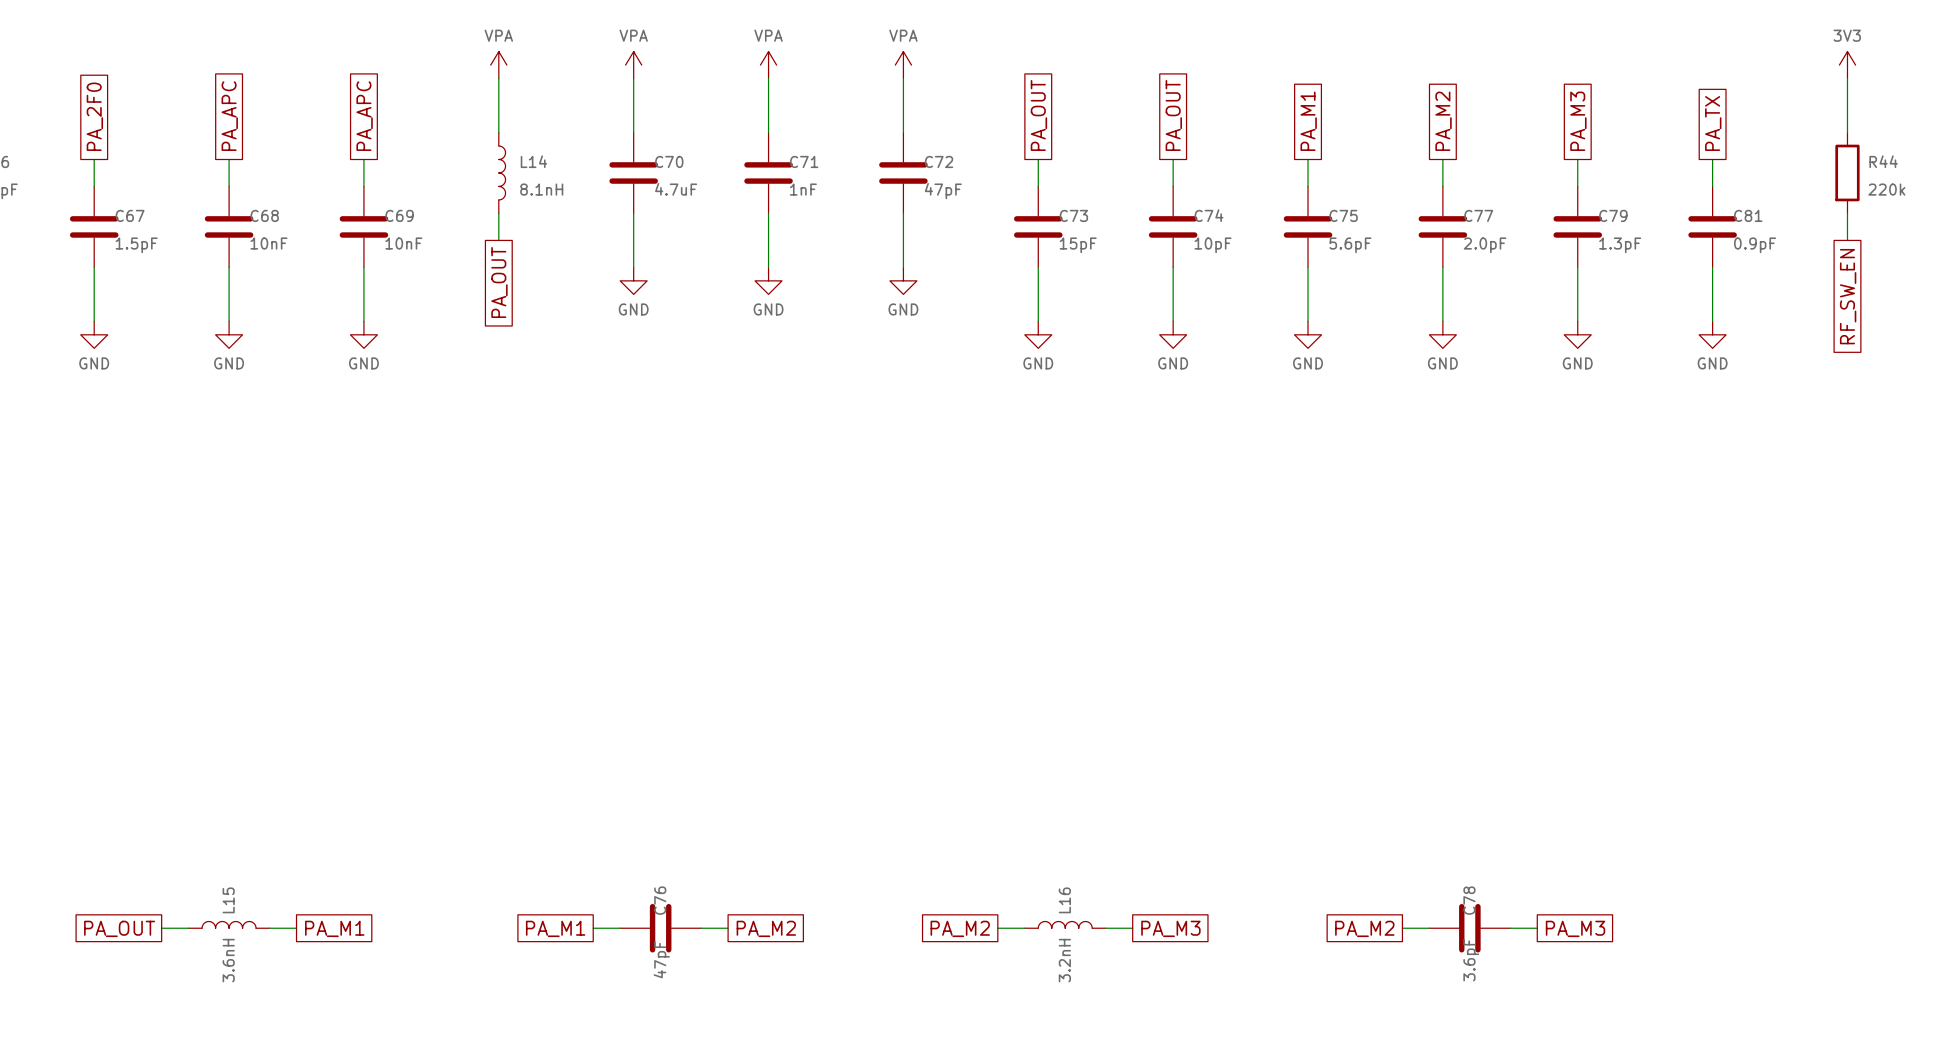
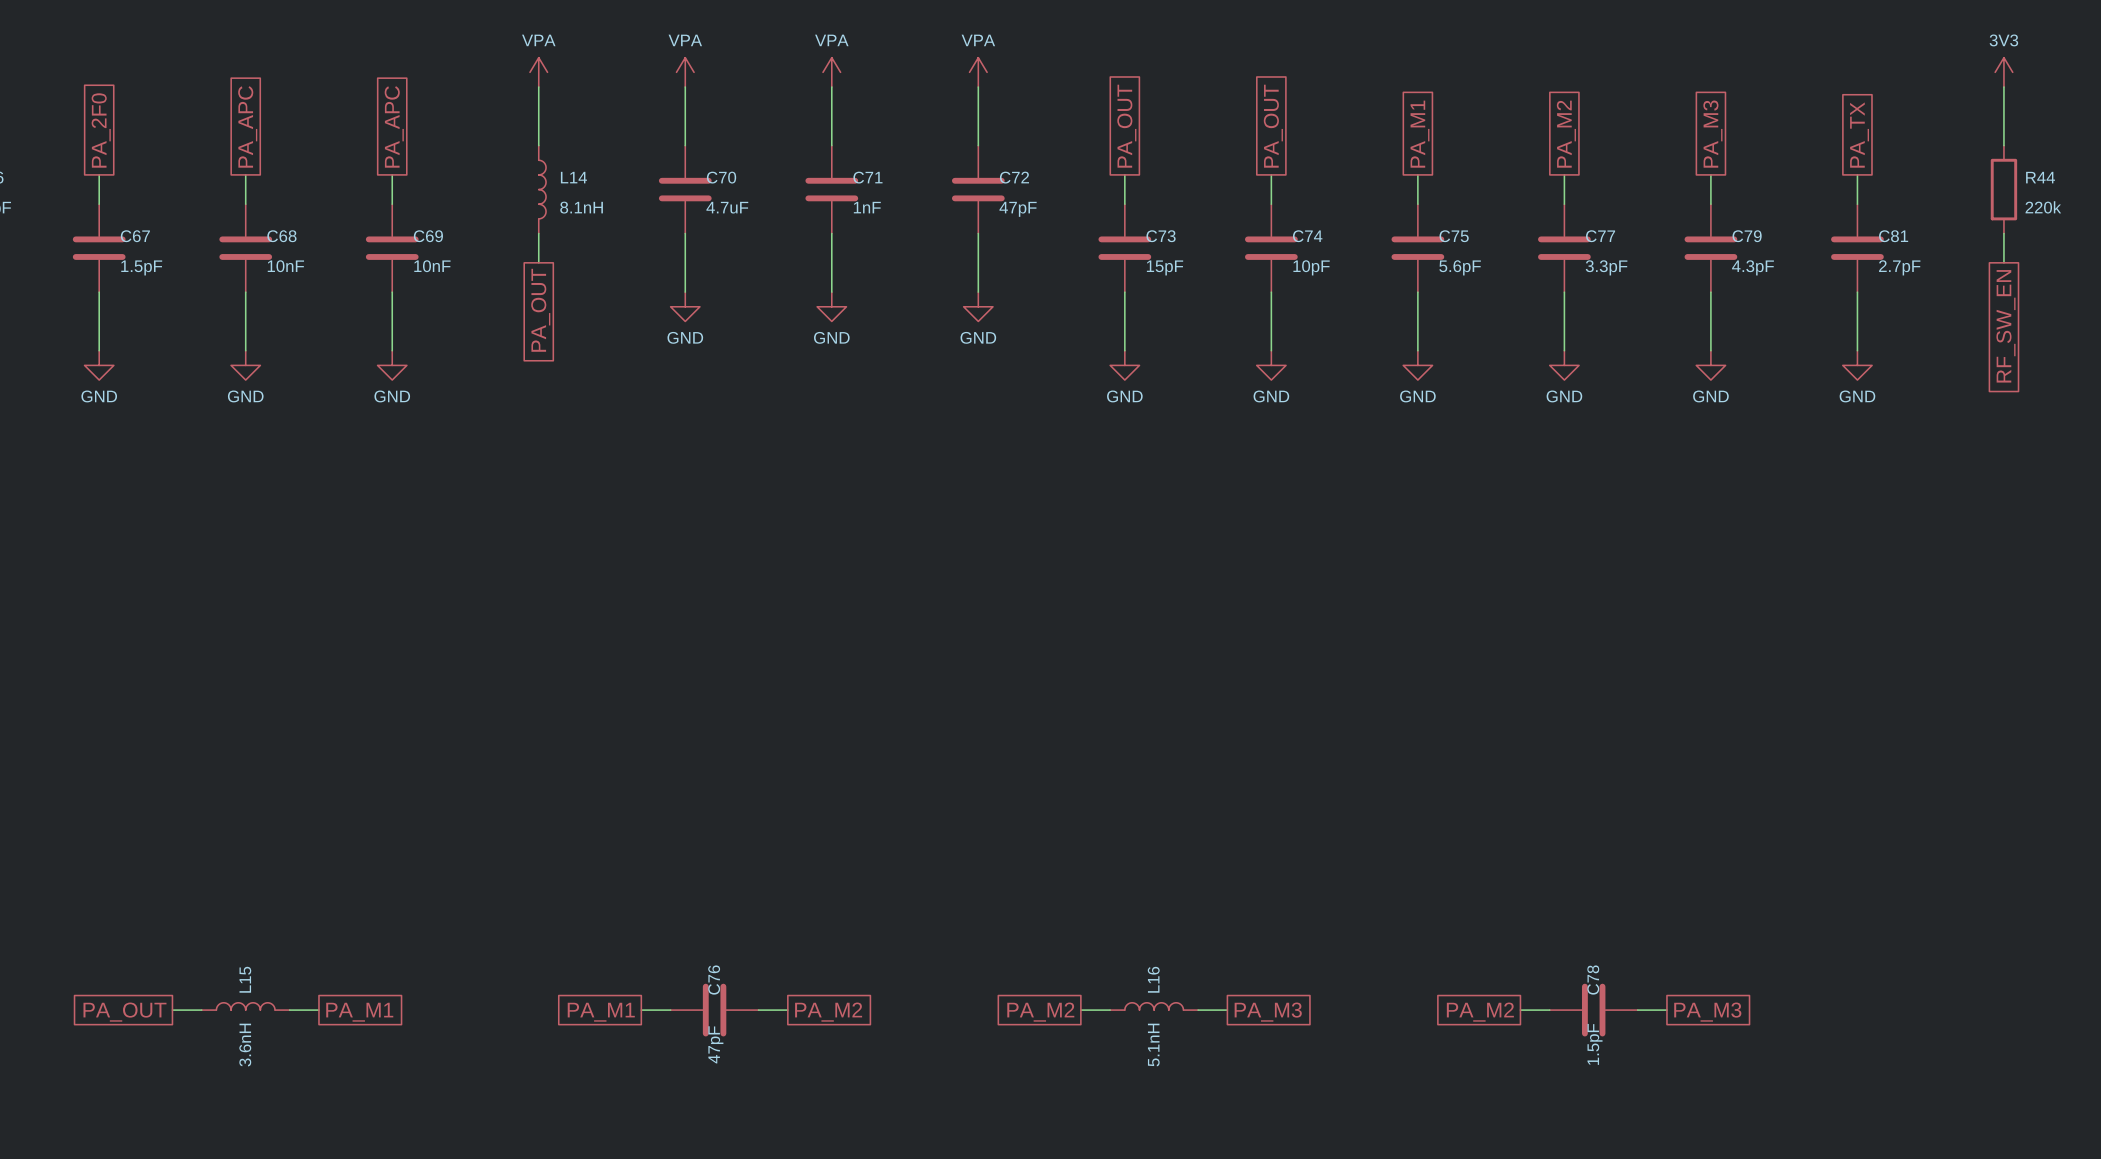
C77 value: 2.0pF (1485, 245) -> 3.3pF (1606, 267)
C79 value: 1.3pF (1620, 245) -> 4.3pF (1752, 267)
C81 value: 0.9pF (1755, 245) -> 2.7pF (1899, 267)
L16 value: 3.2nH (1064, 960) -> 5.1nH (1153, 1045)
C78 value: 3.6pF (1471, 960) -> 1.5pF (1595, 1044)

